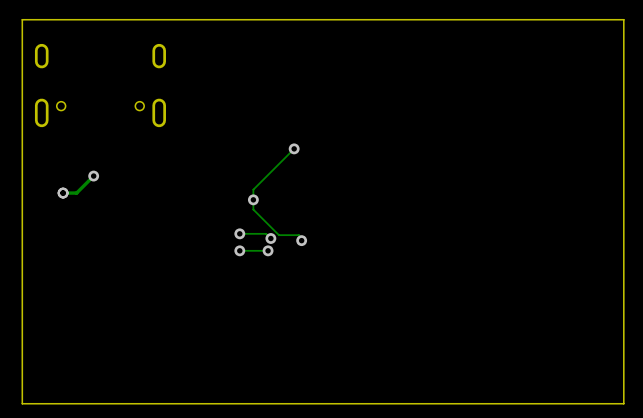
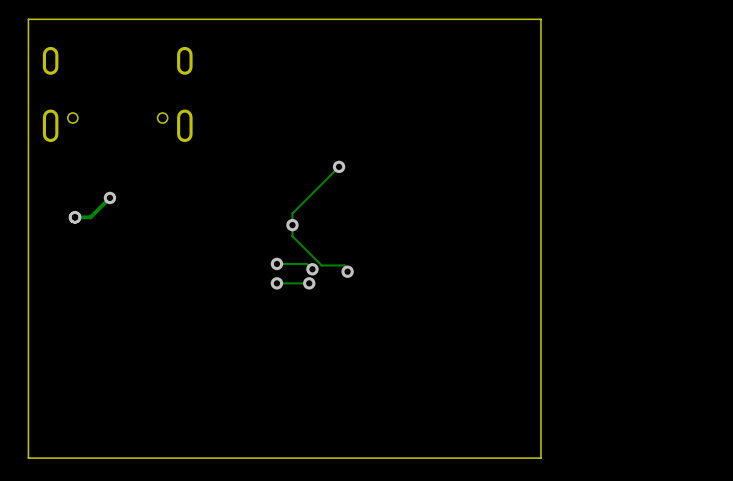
board edge: (470, 19) (623, 19) (623, 403) (470, 403) -> (540, 19) (540, 458)

